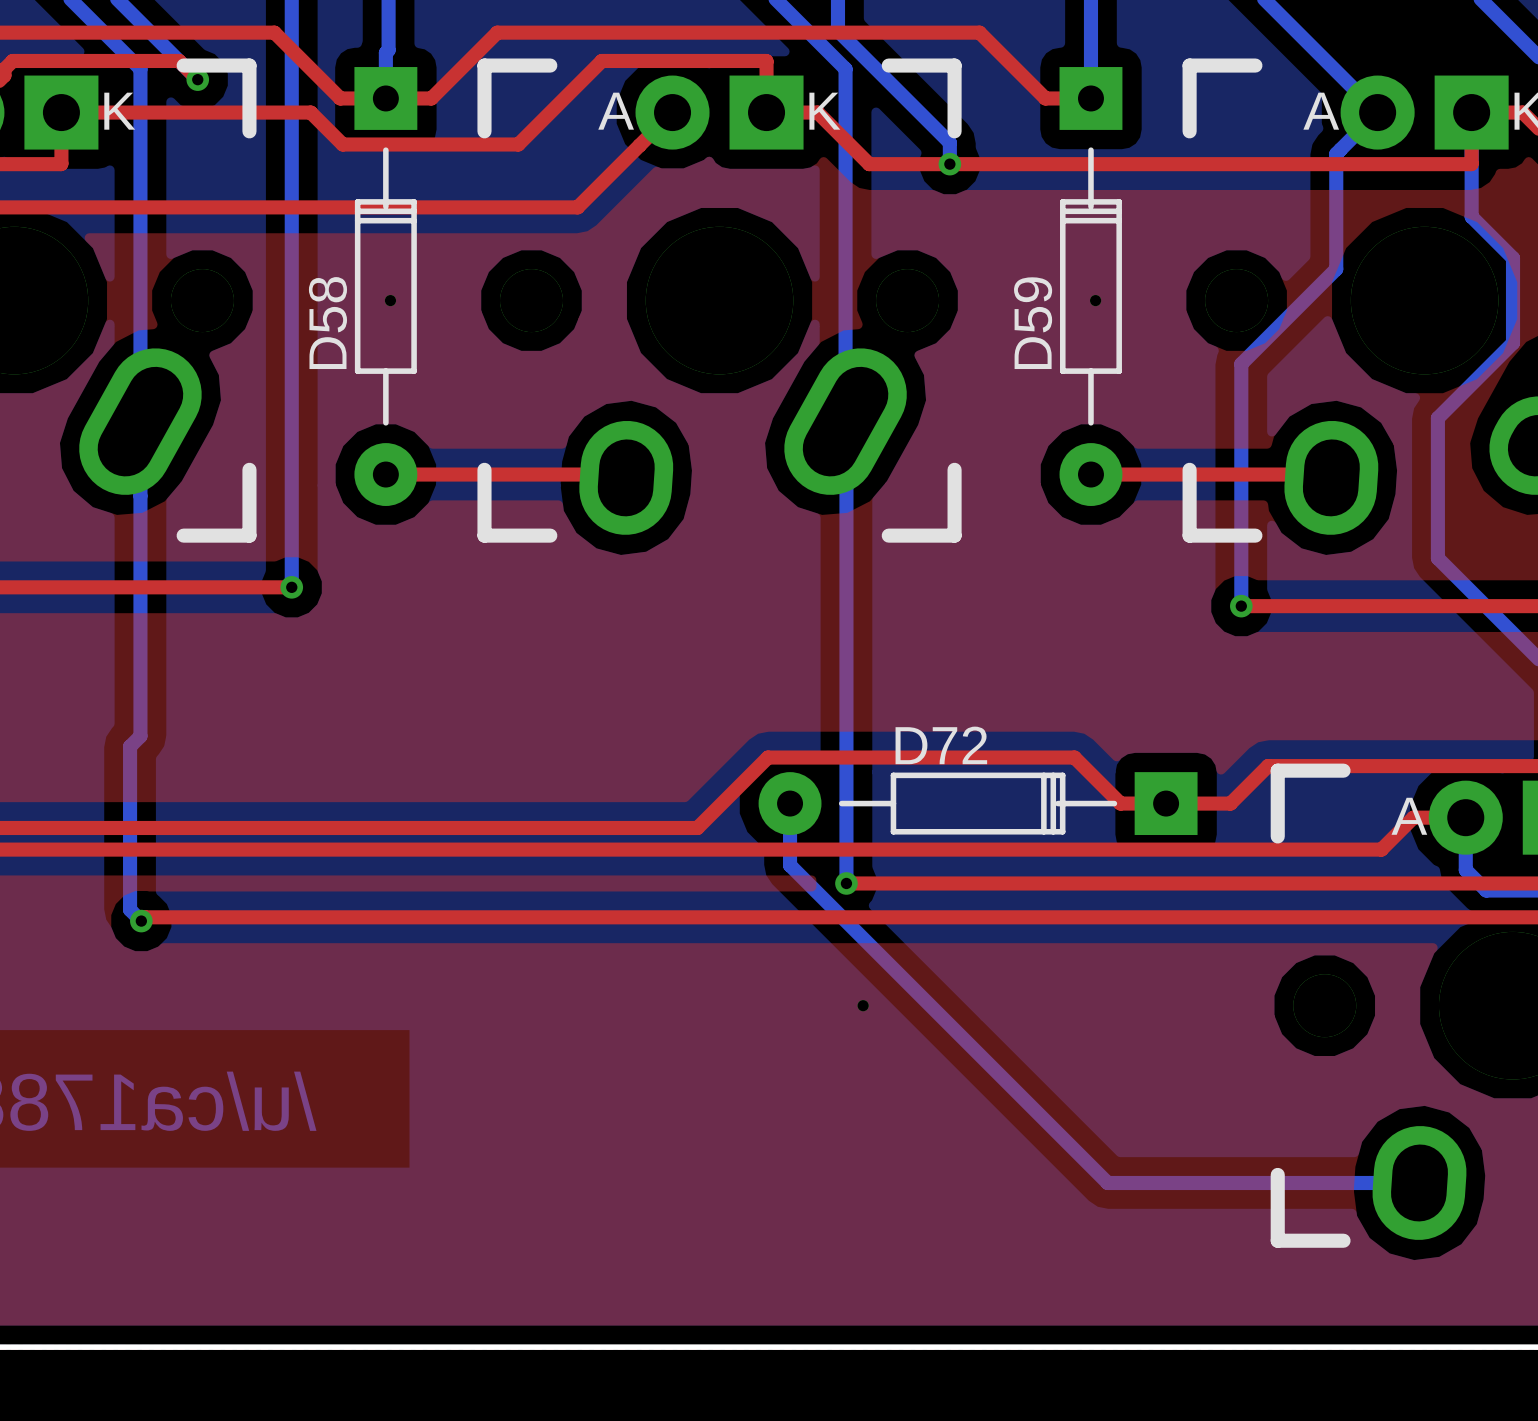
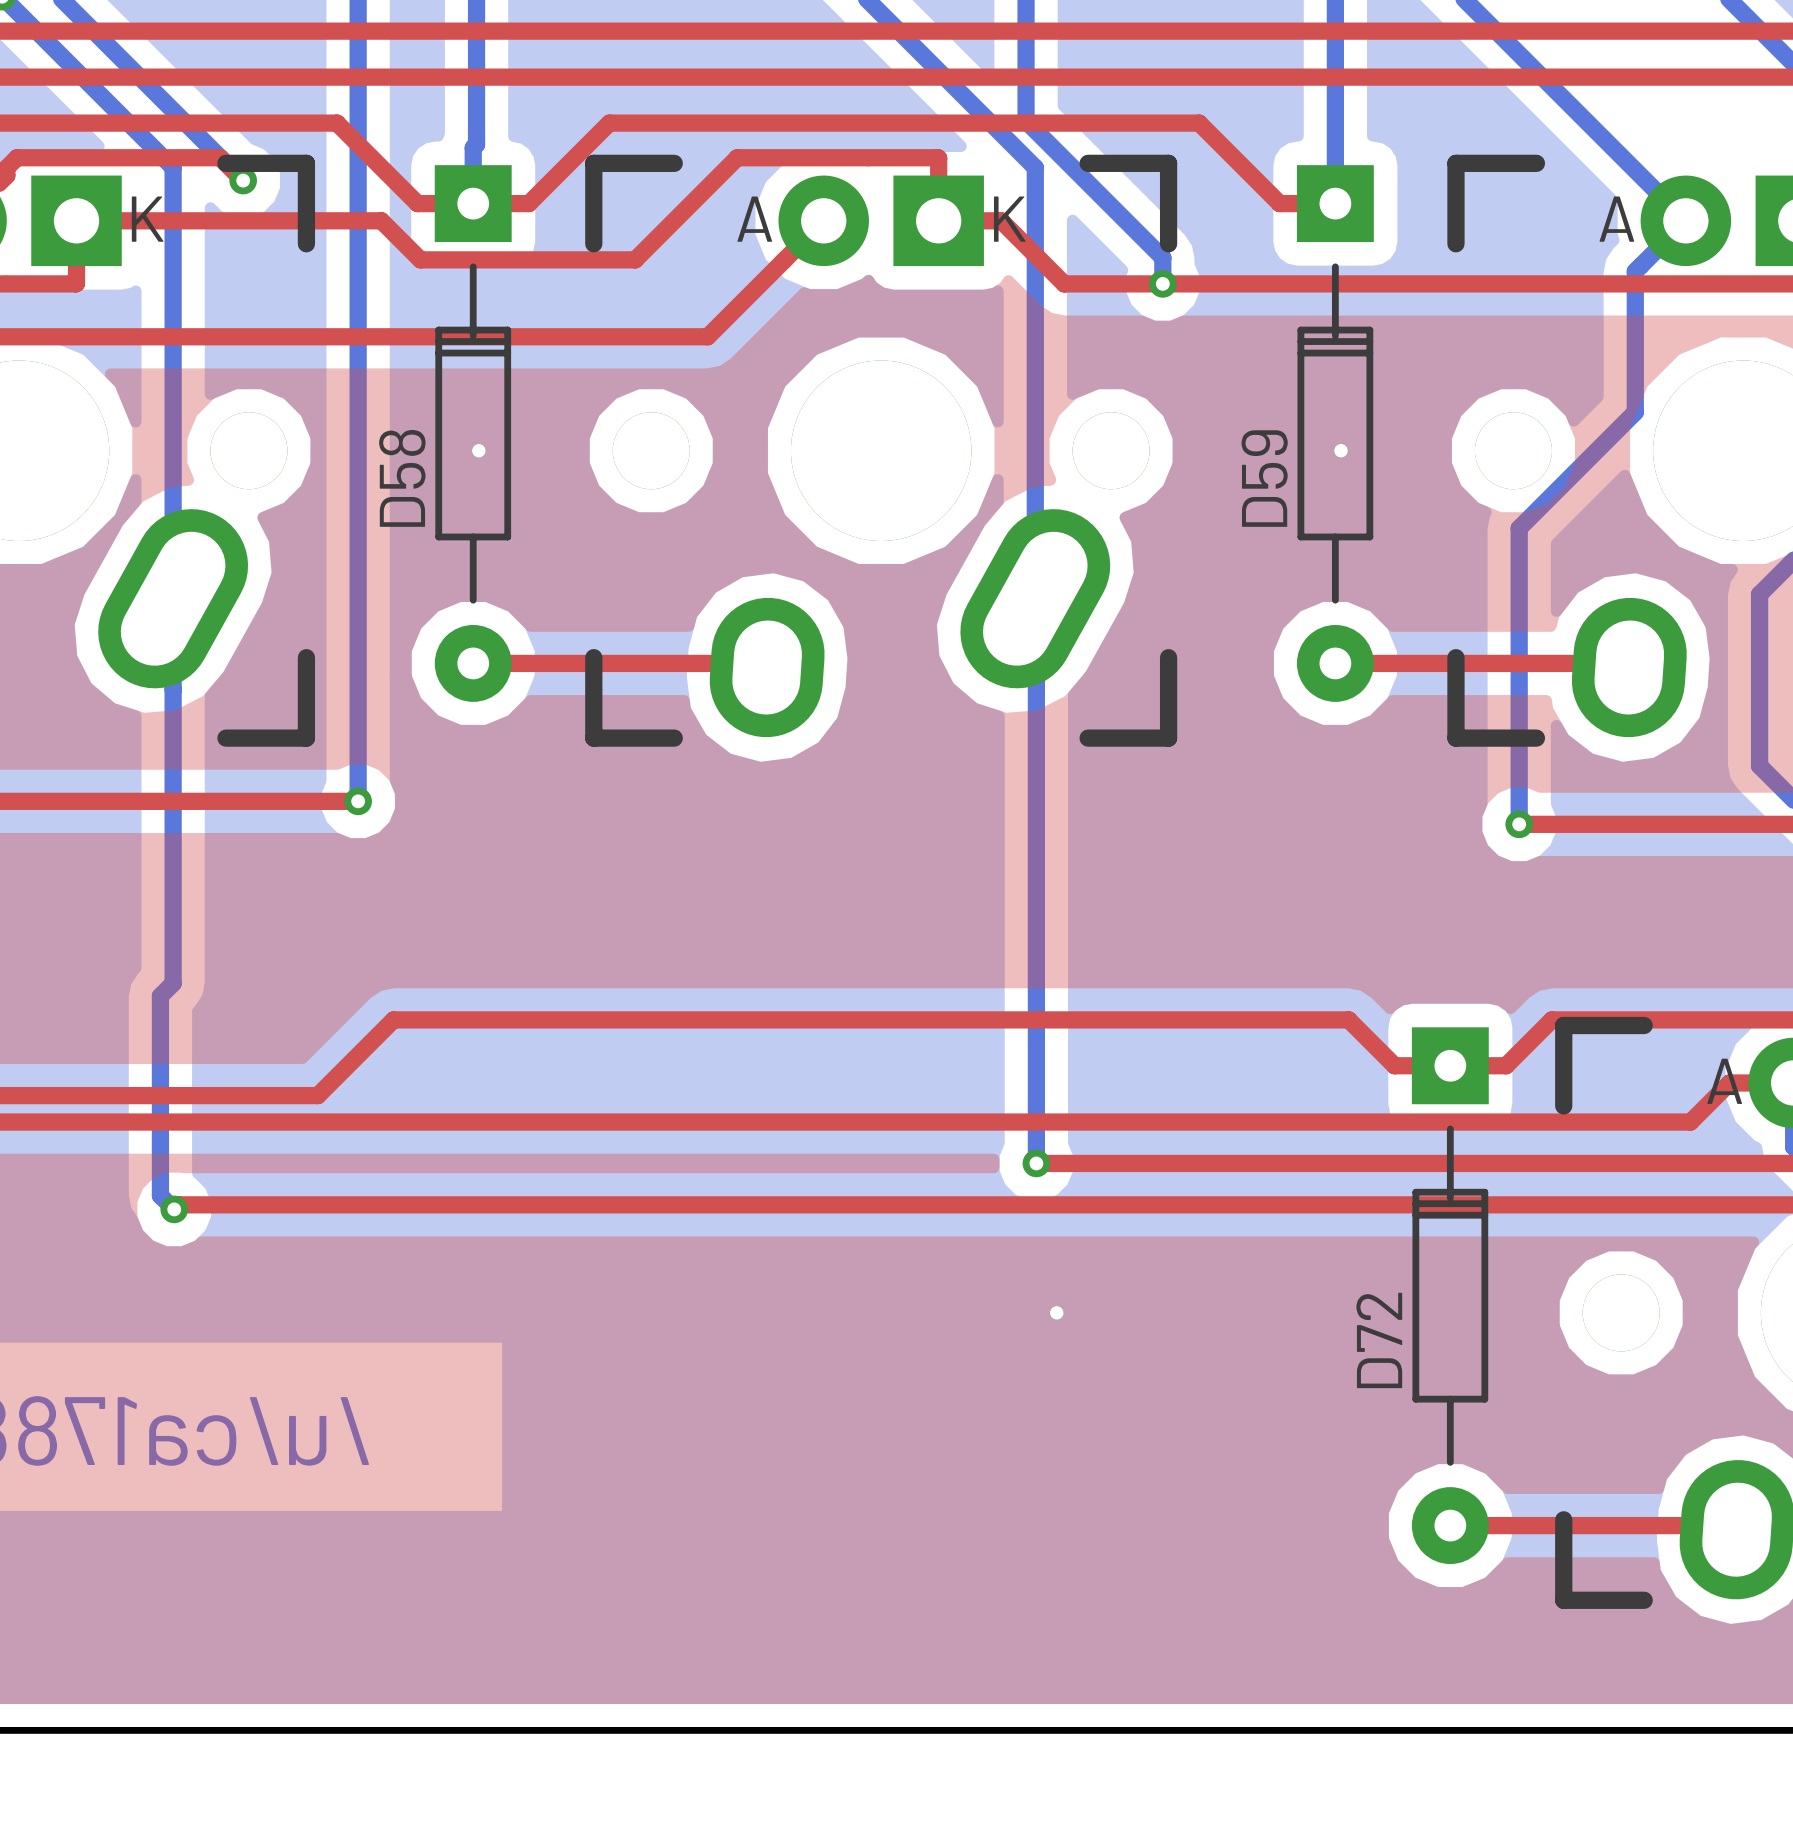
bottom track: (790, 803) (790, 865) (1107, 1182) (1419, 1182) -> none
D72 rotation: 0° (978, 803) -> 90° counterclockwise (1450, 1295)
D72 position: (978, 803) -> (1450, 1295)
top track: (1139, 803) (1120, 803) (1074, 757) (767, 757) (697, 827) (258, 827) -> (1394, 1065) (1348, 1019) (393, 1019) (317, 1095)
top track: none -> (1450, 1525) (1732, 1525)

